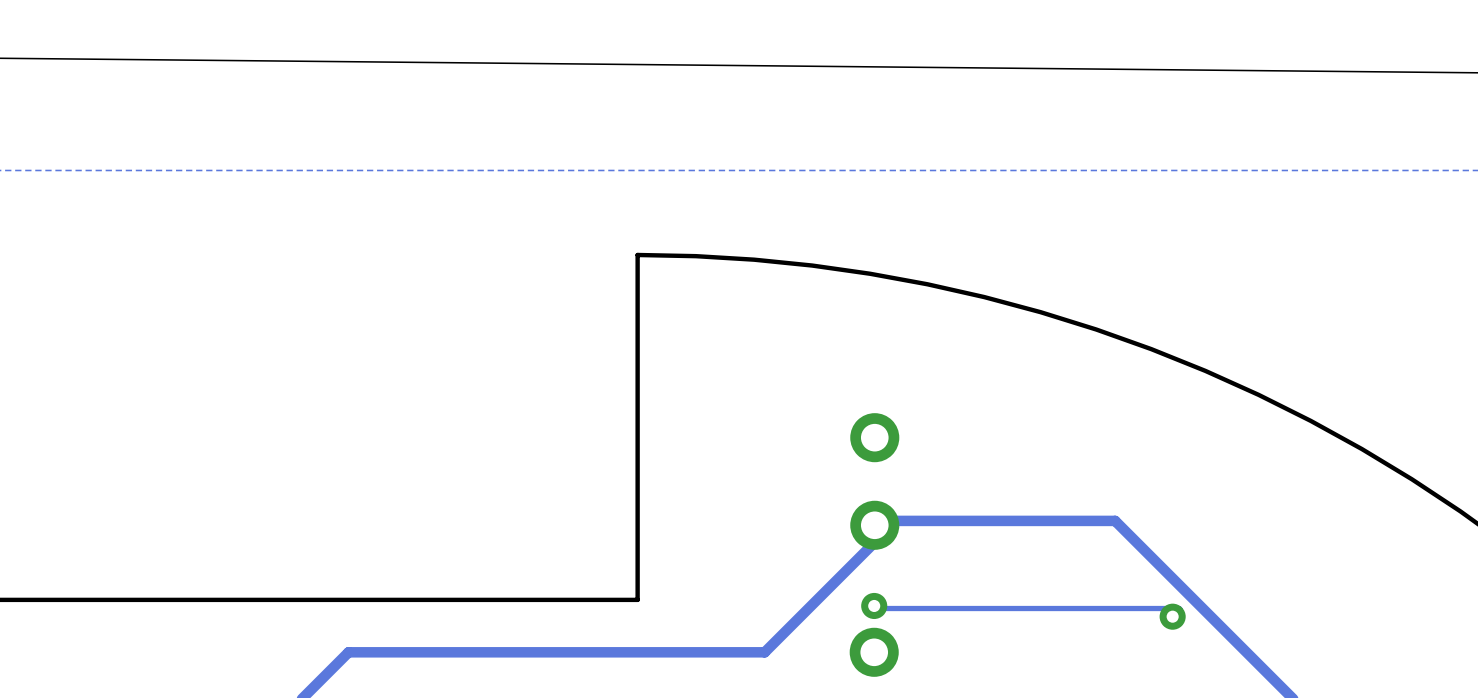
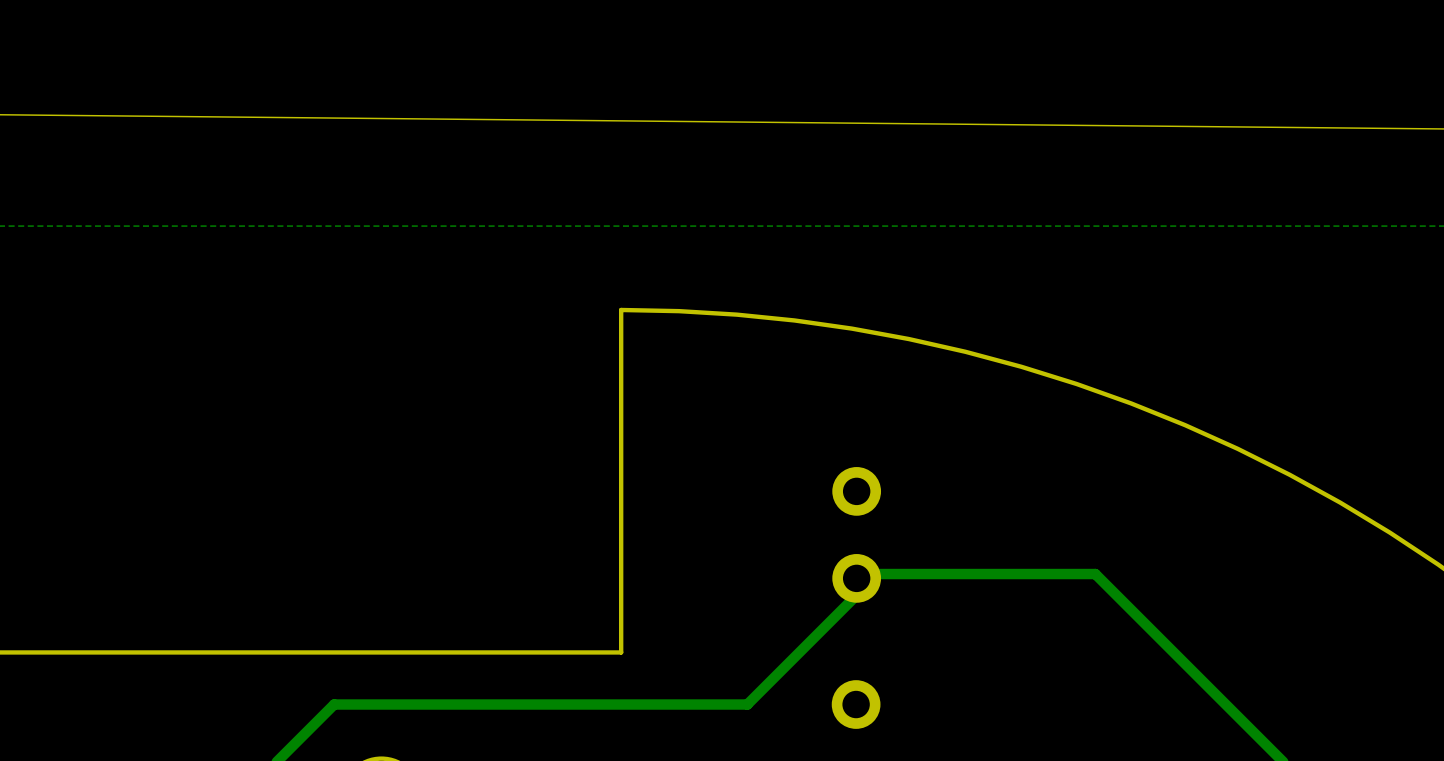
track: (874, 605) (876, 608) (1179, 608) (1172, 616) -> none
via: (874, 605) -> none
via: (1172, 616) -> none

